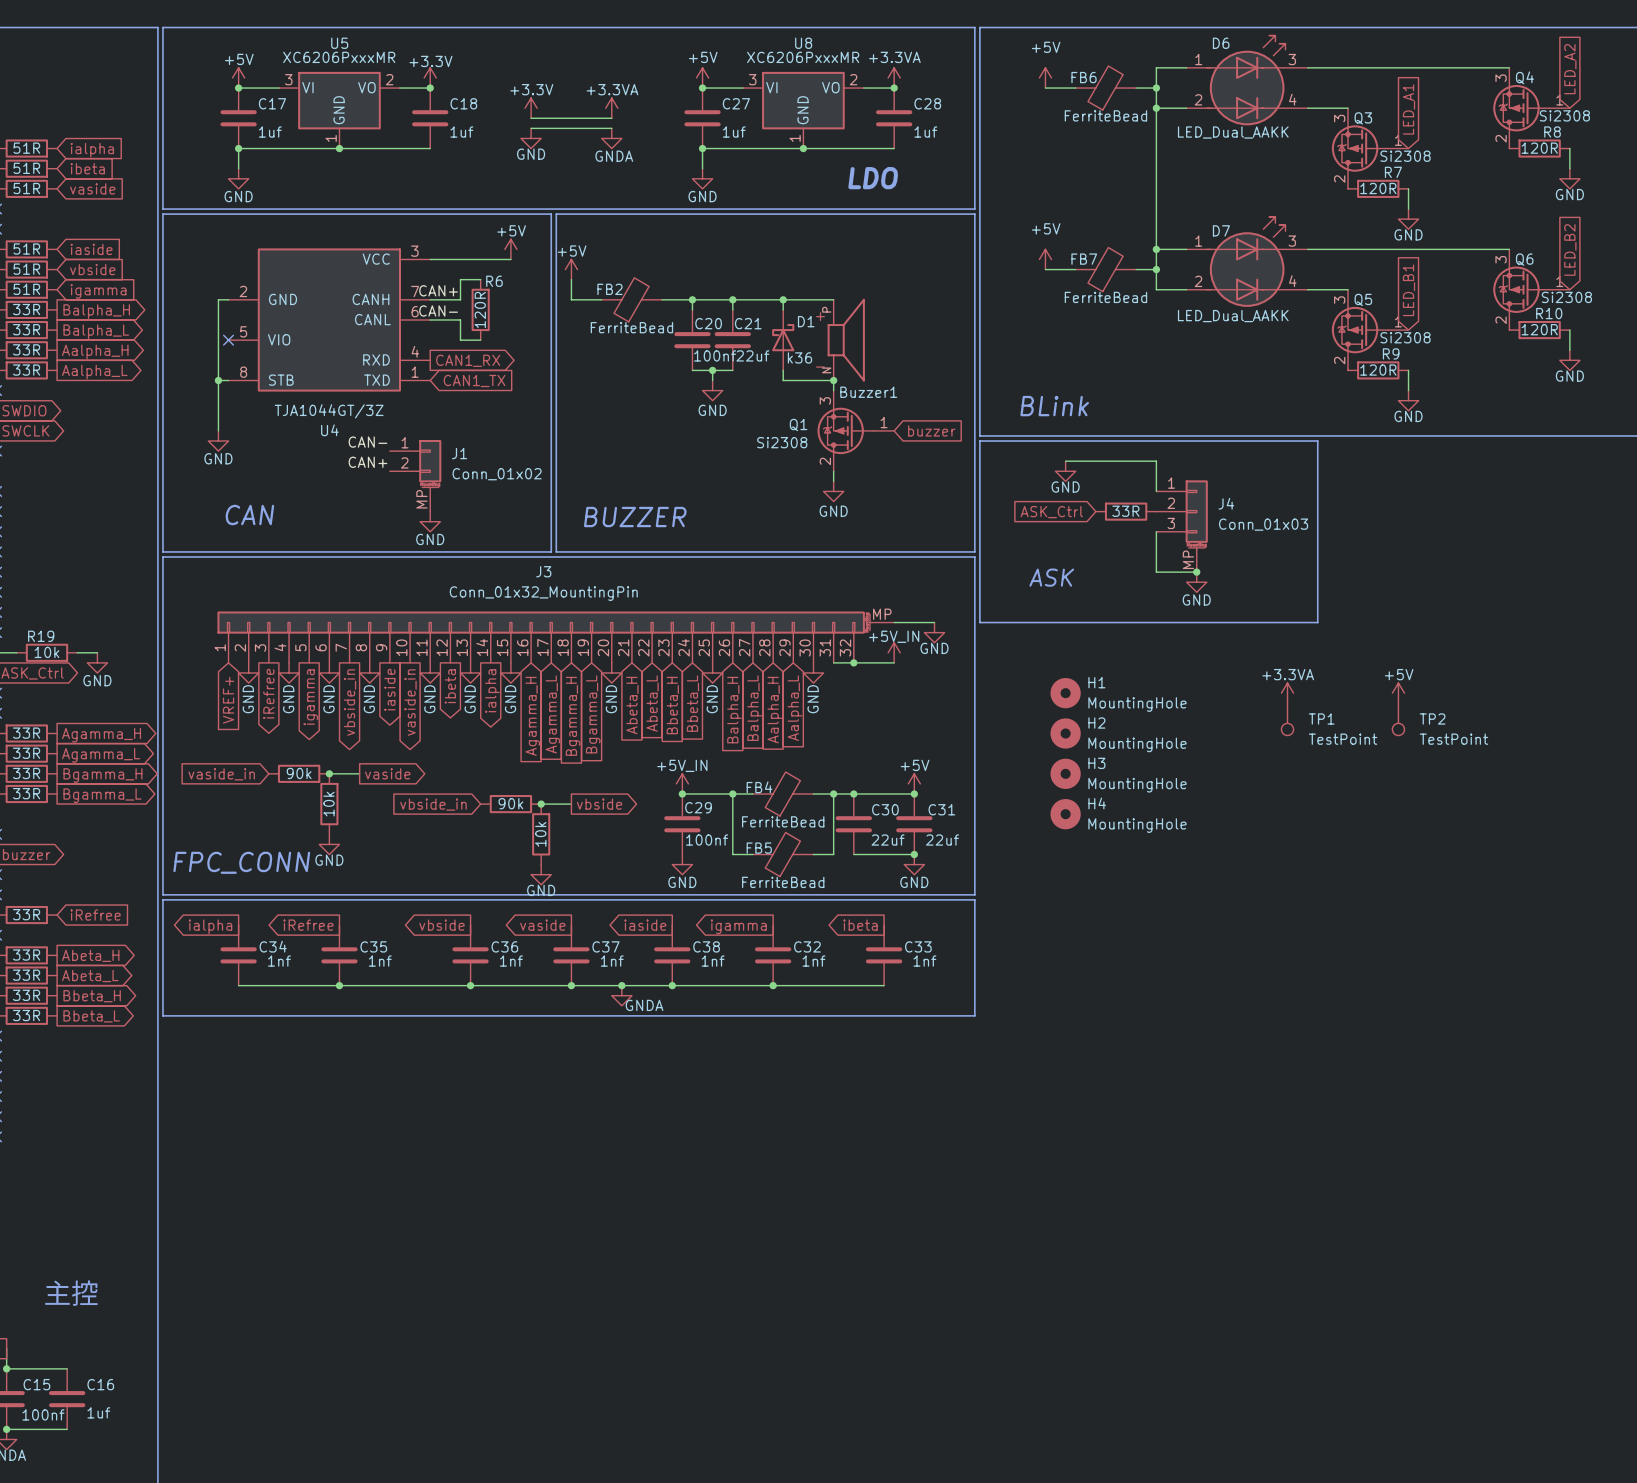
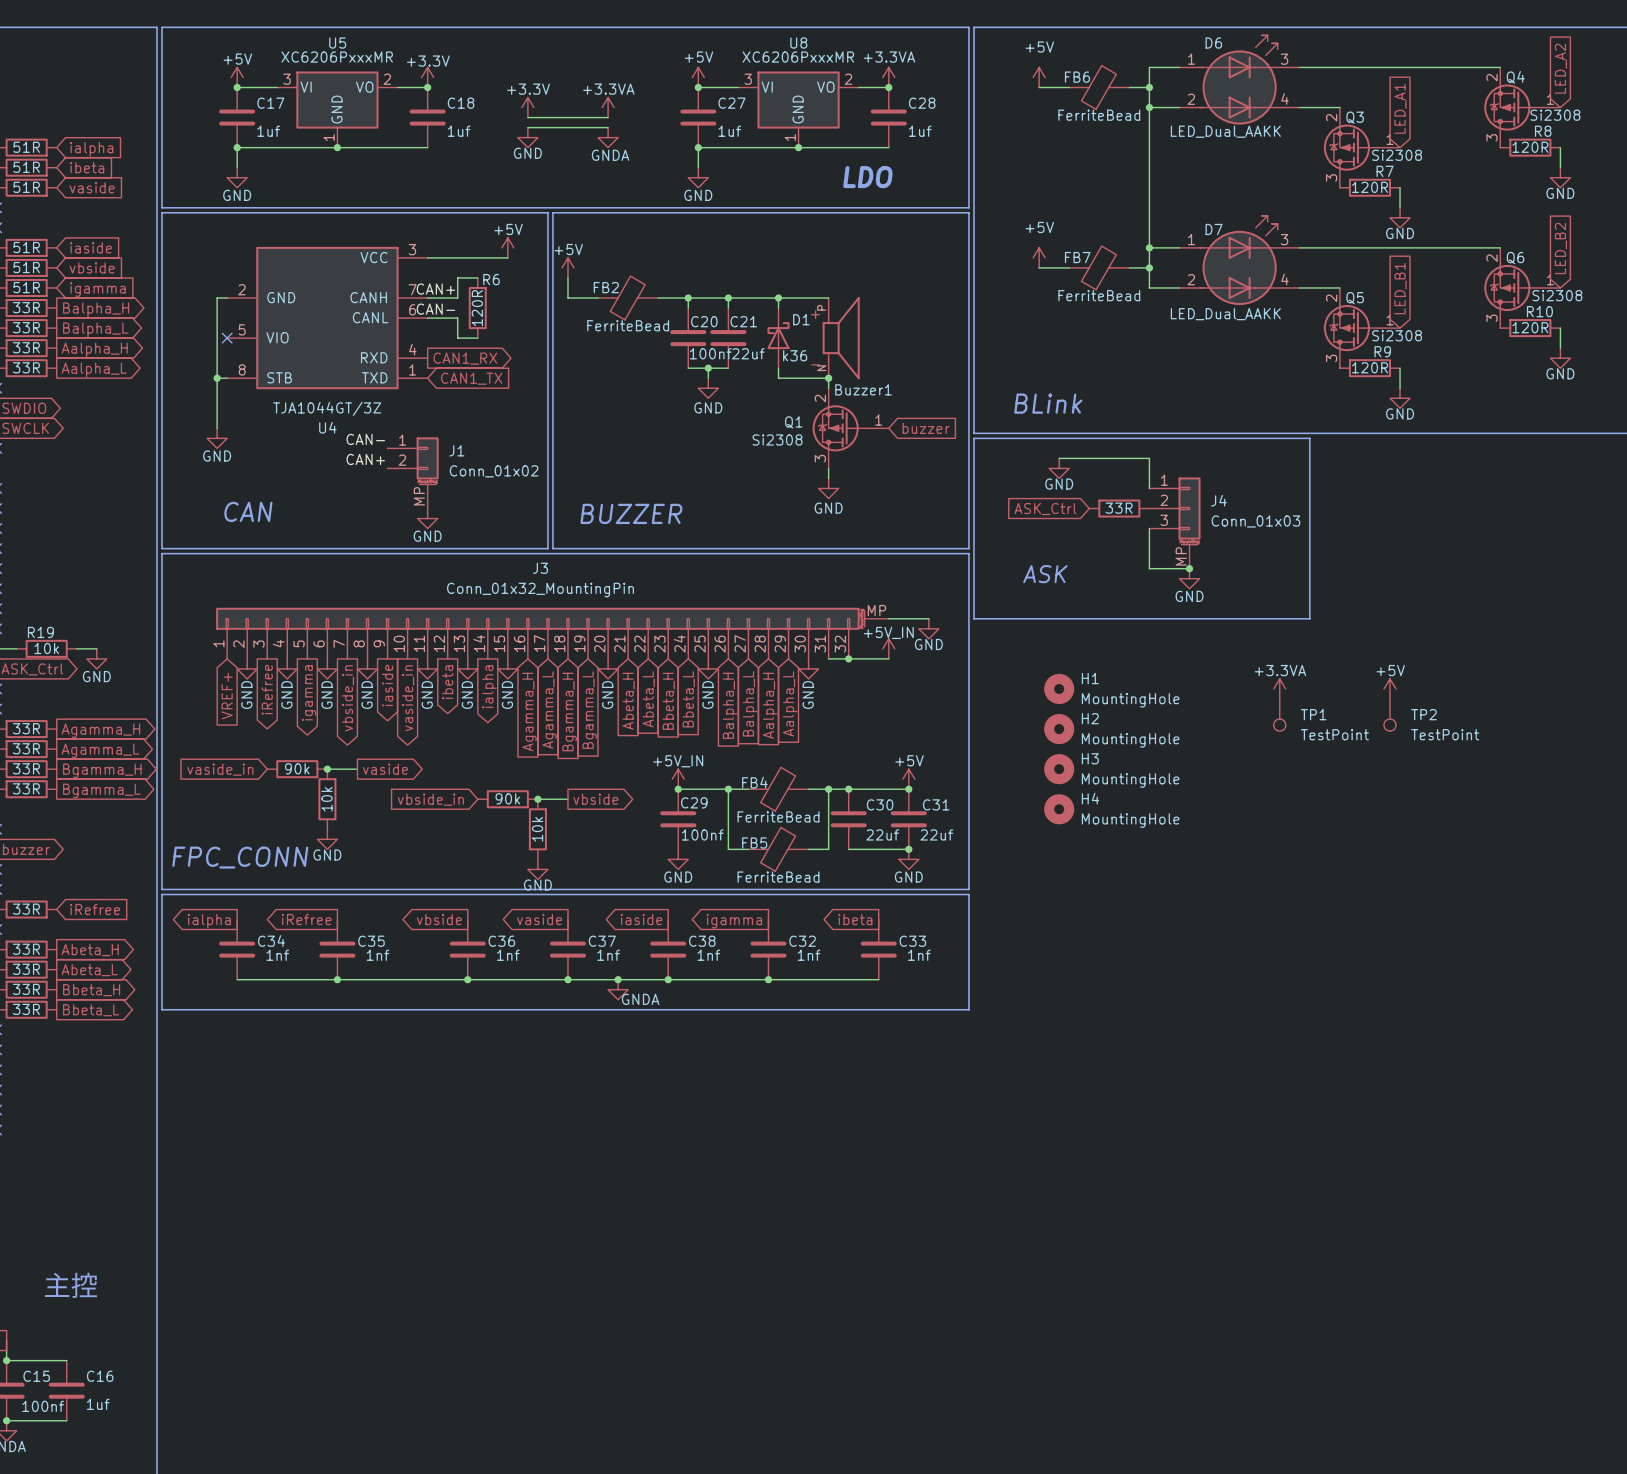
Q4 pin number: 3 (1501, 78) -> 2 (1492, 77)
Q3 pin number: 3 (1339, 118) -> 2 (1331, 117)
Q4 pin number: 2 (1501, 138) -> 3 (1492, 137)
Q3 pin number: 2 (1339, 179) -> 3 (1331, 177)
Q6 pin number: 3 (1501, 259) -> 2 (1492, 258)
Q5 pin number: 3 (1339, 300) -> 2 (1331, 298)
Q6 pin number: 2 (1501, 320) -> 3 (1492, 318)
Q5 pin number: 2 (1339, 360) -> 3 (1331, 358)
Q1 pin number: 3 (825, 400) -> 2 (820, 398)
Q1 pin number: 2 (825, 461) -> 3 (820, 458)

